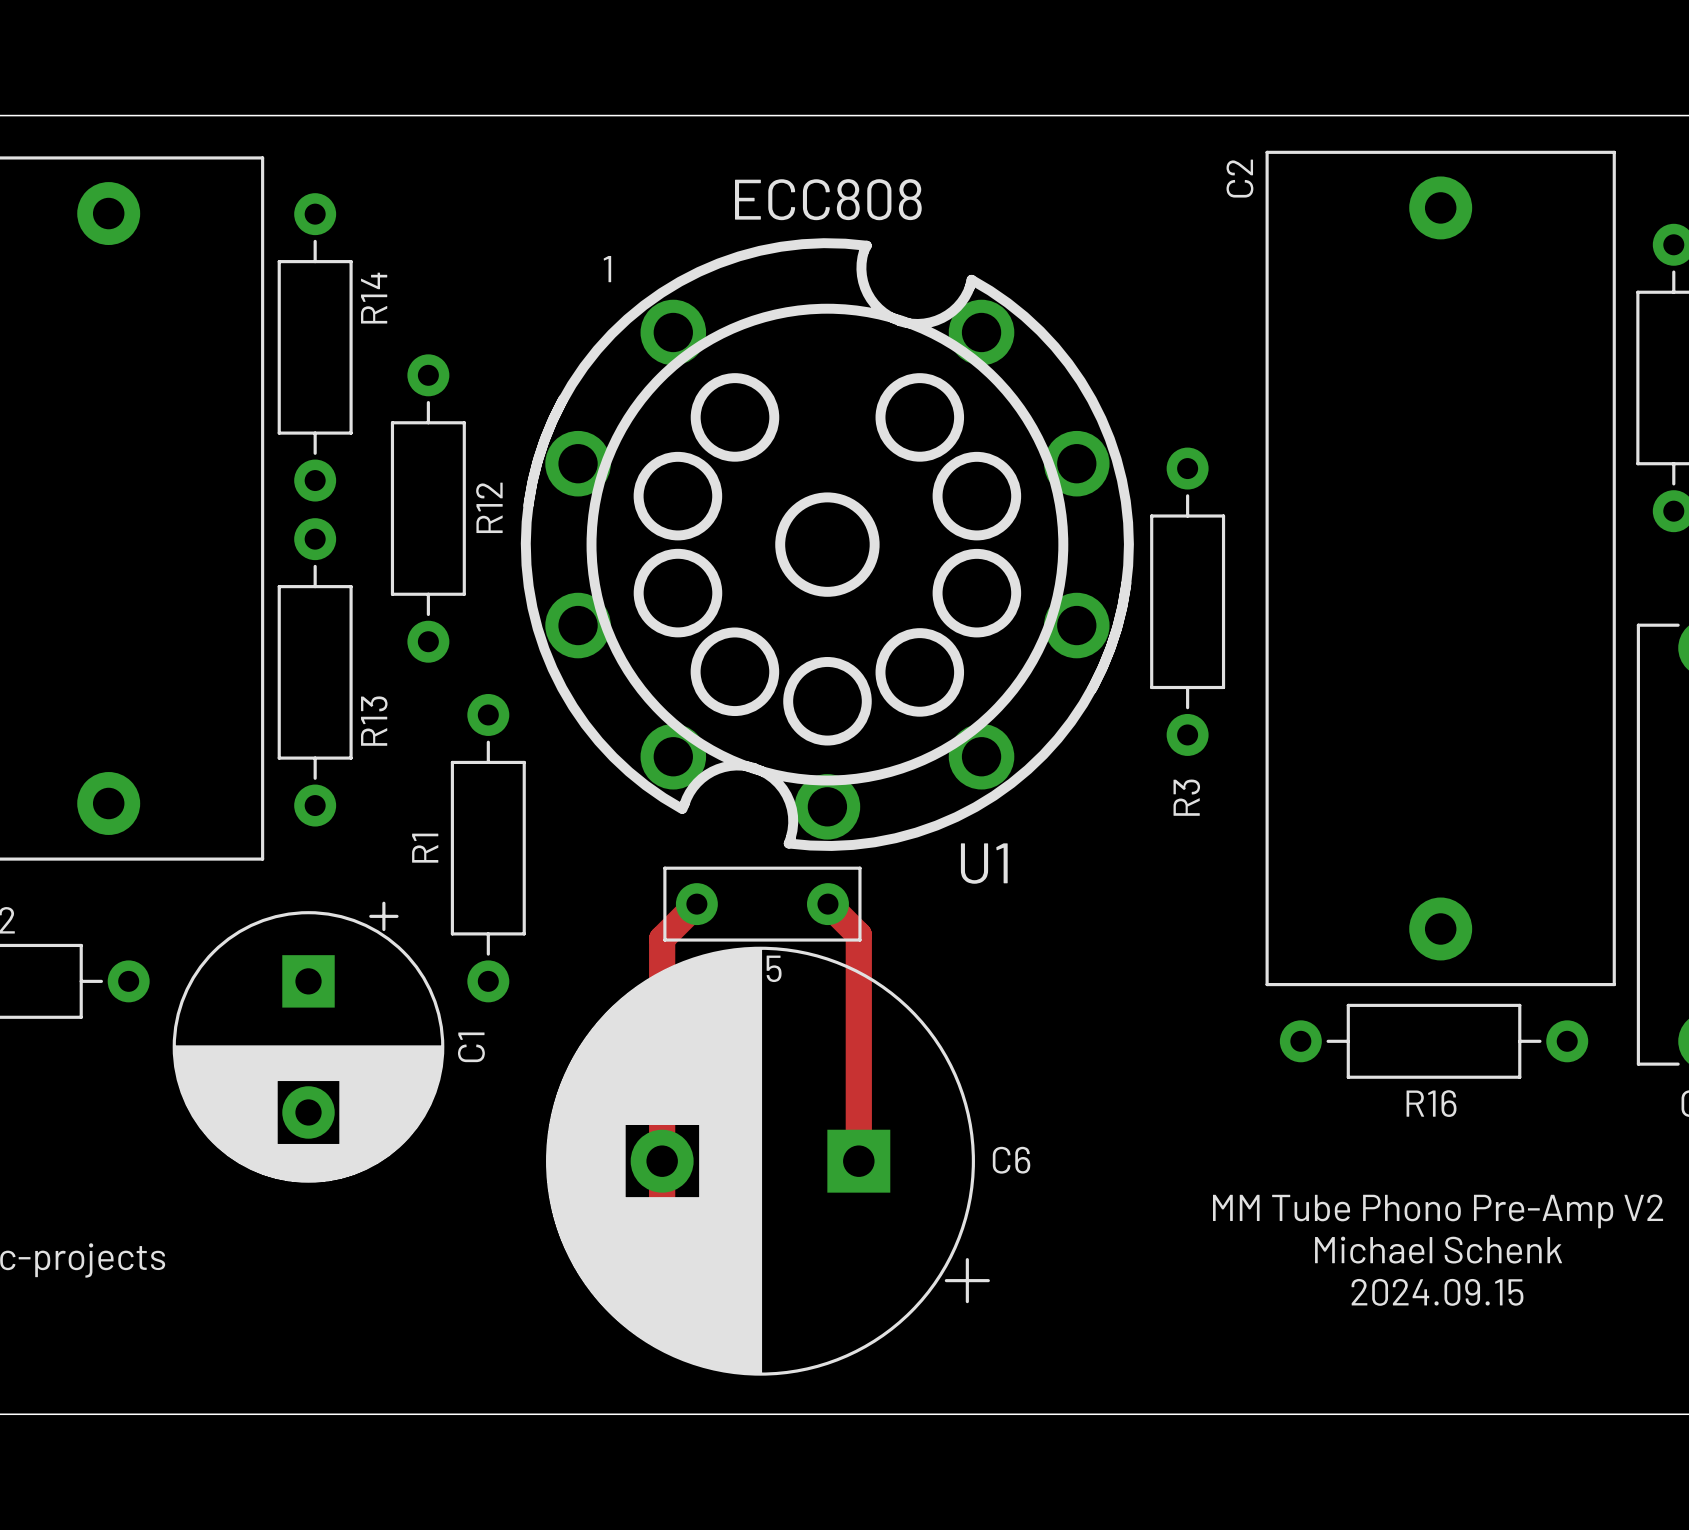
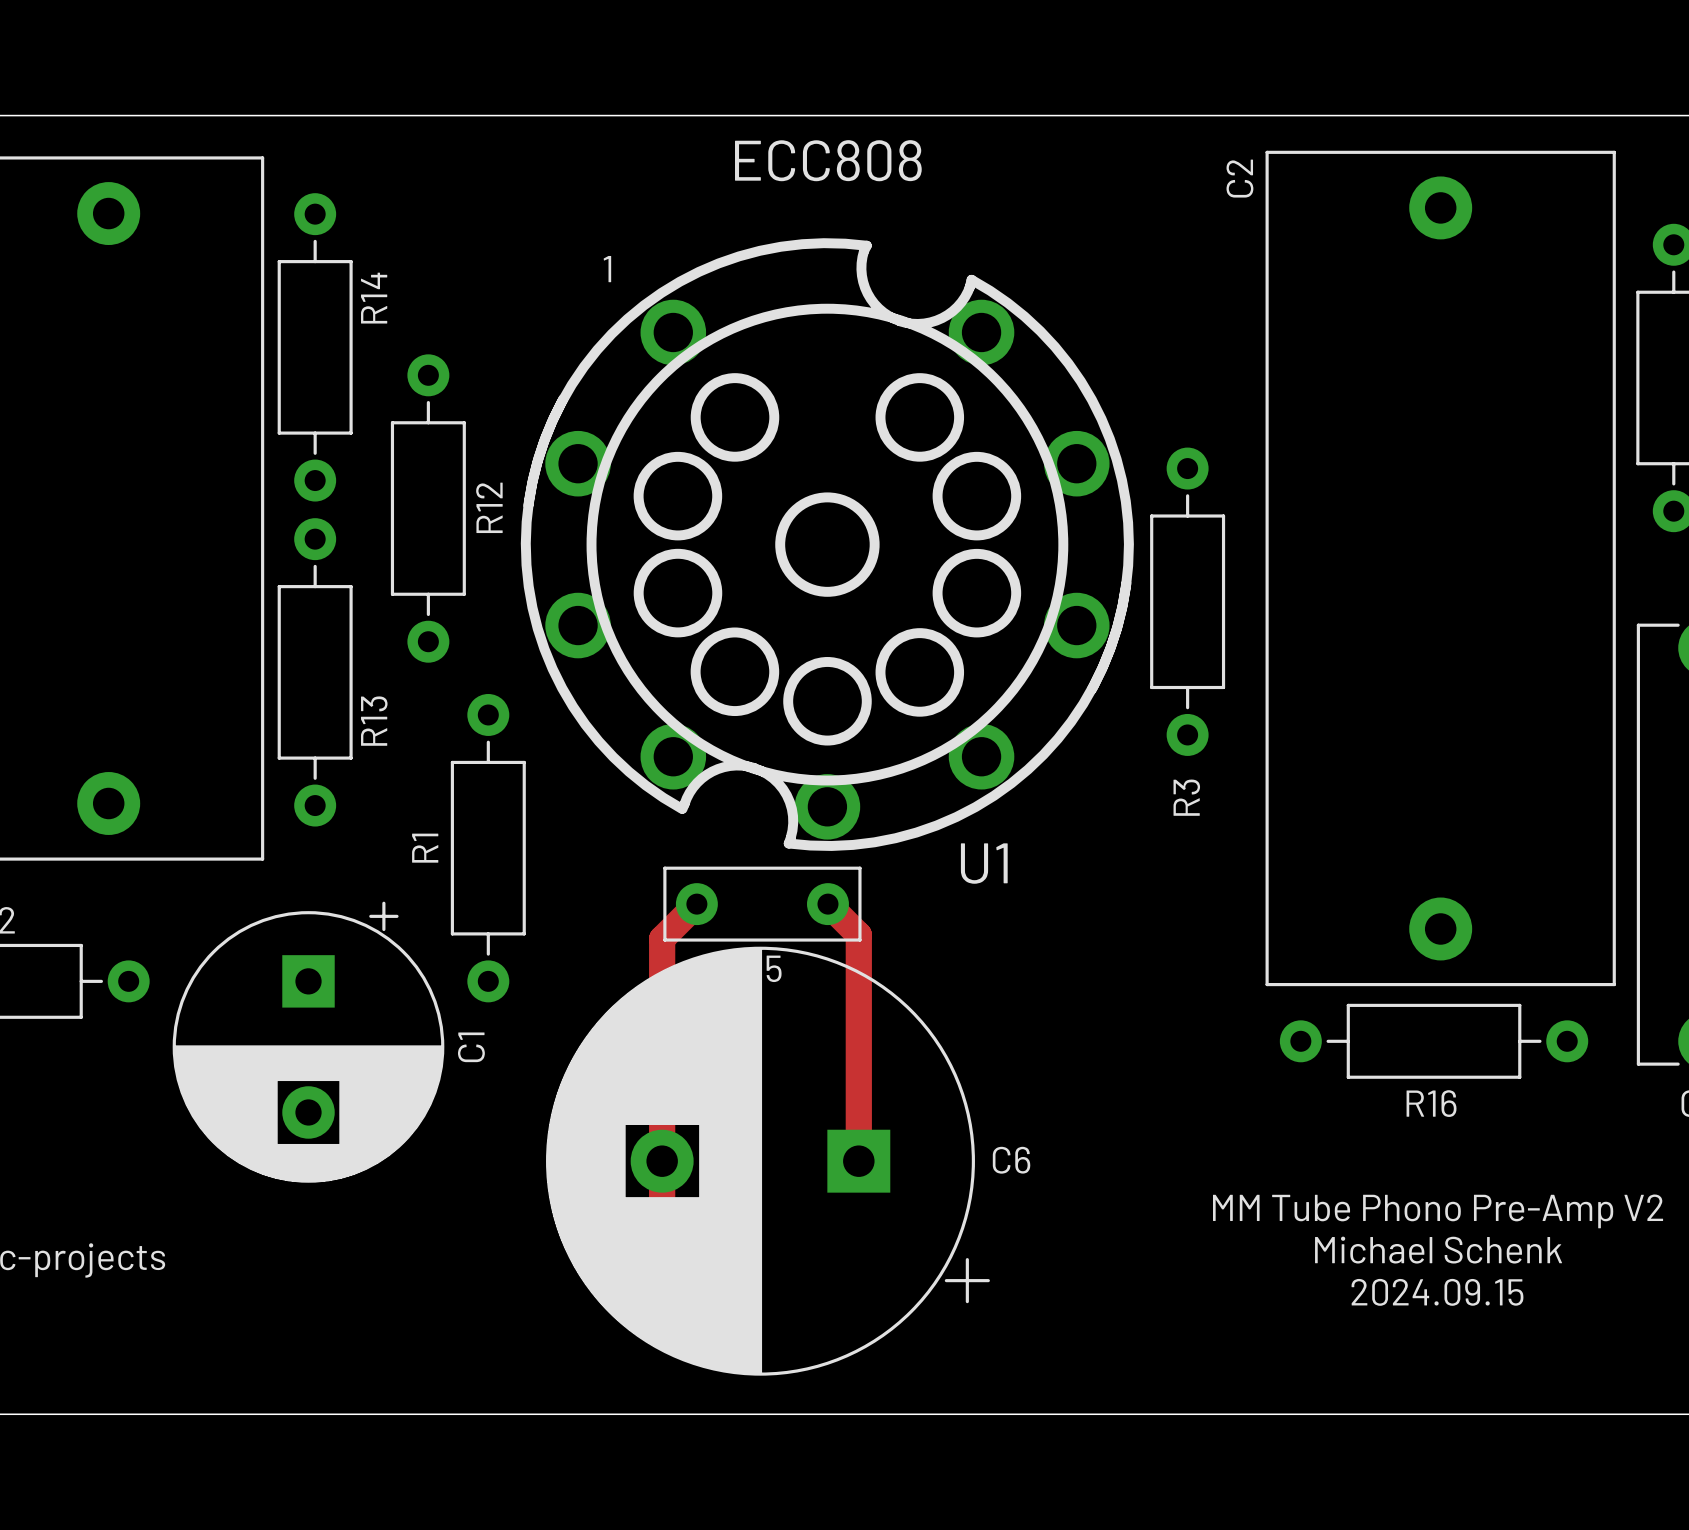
U1 value position: ECC808 (828, 199) -> ECC808 (828, 160)

